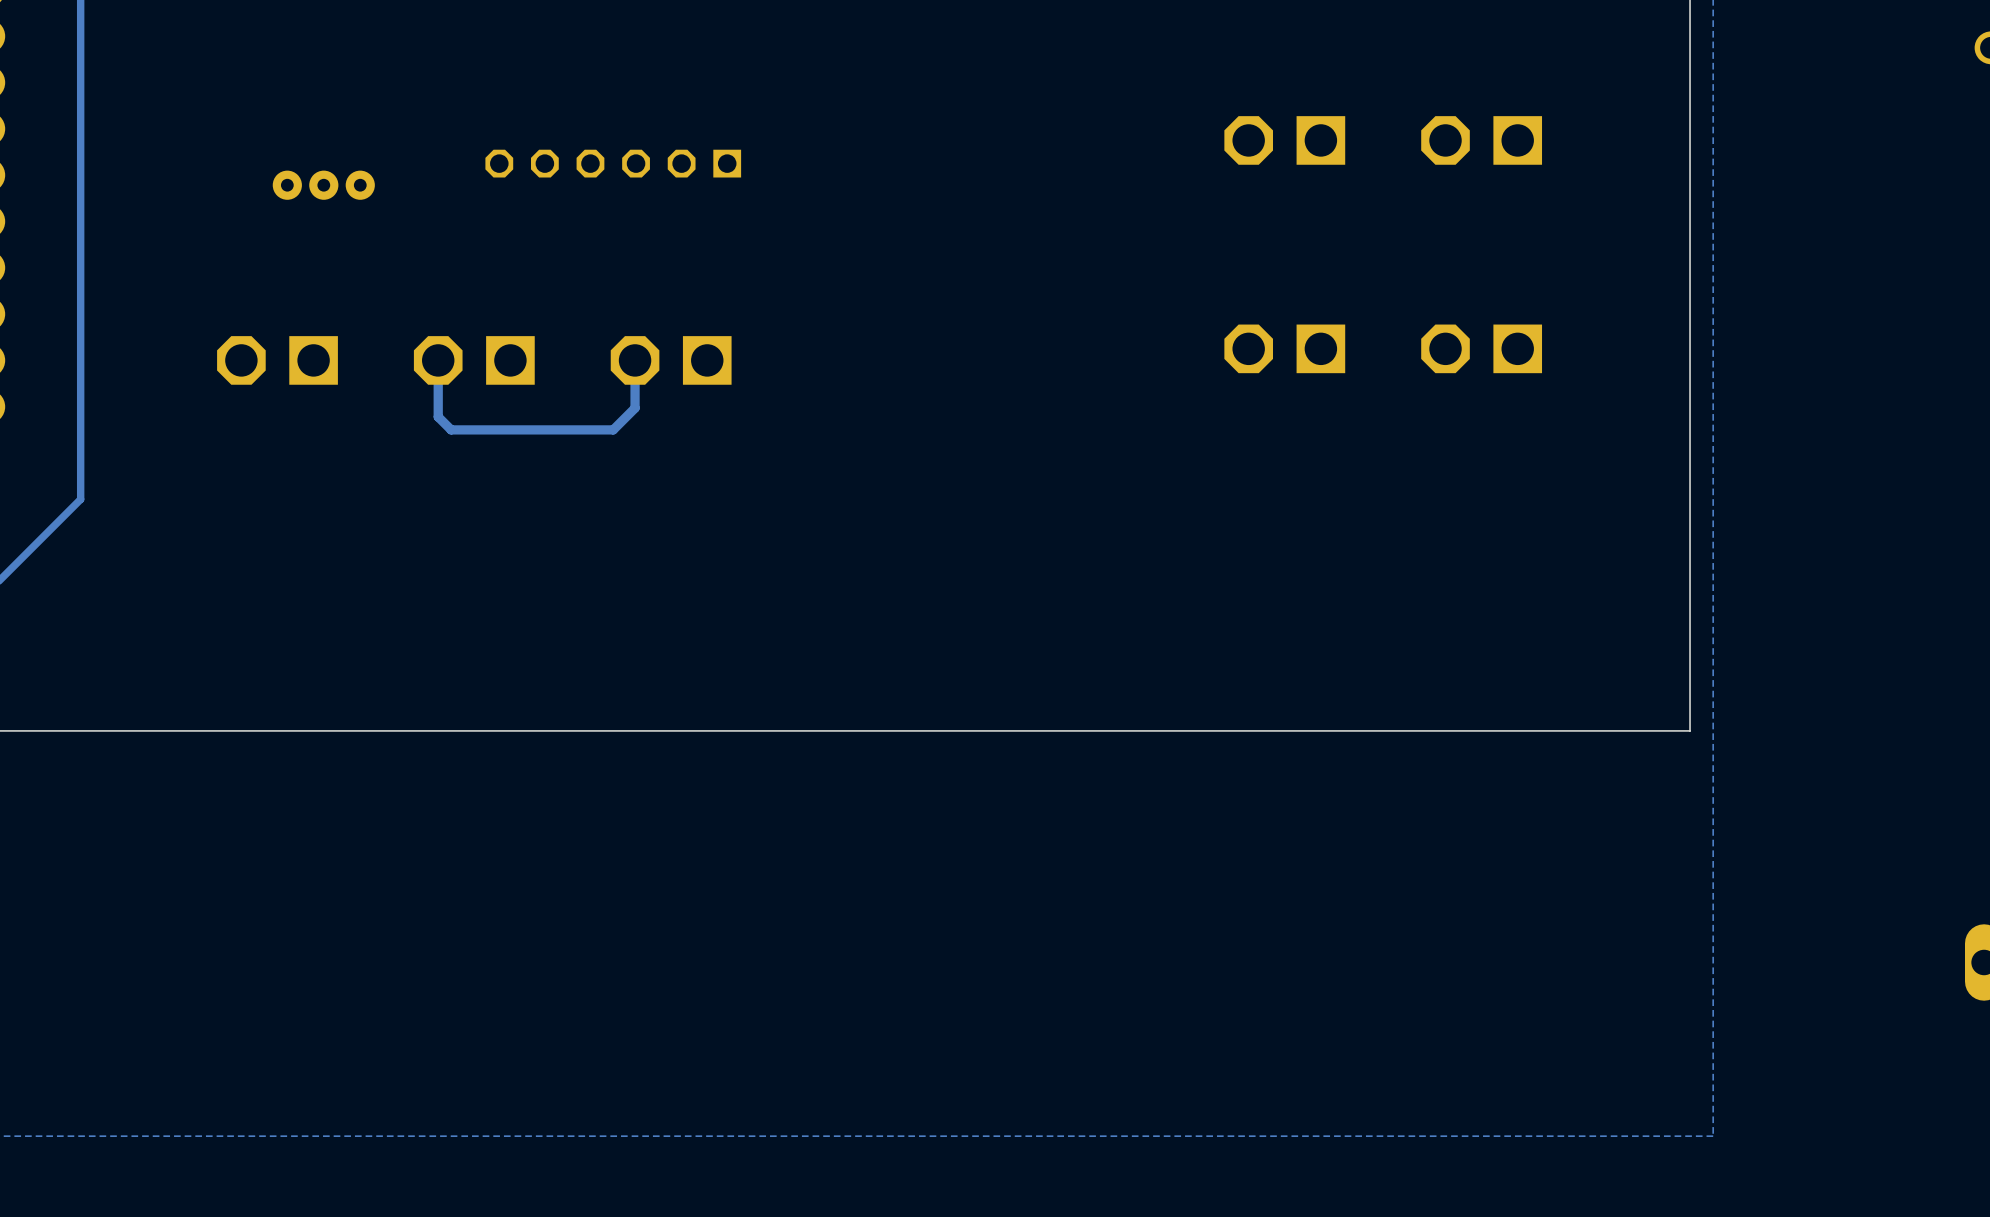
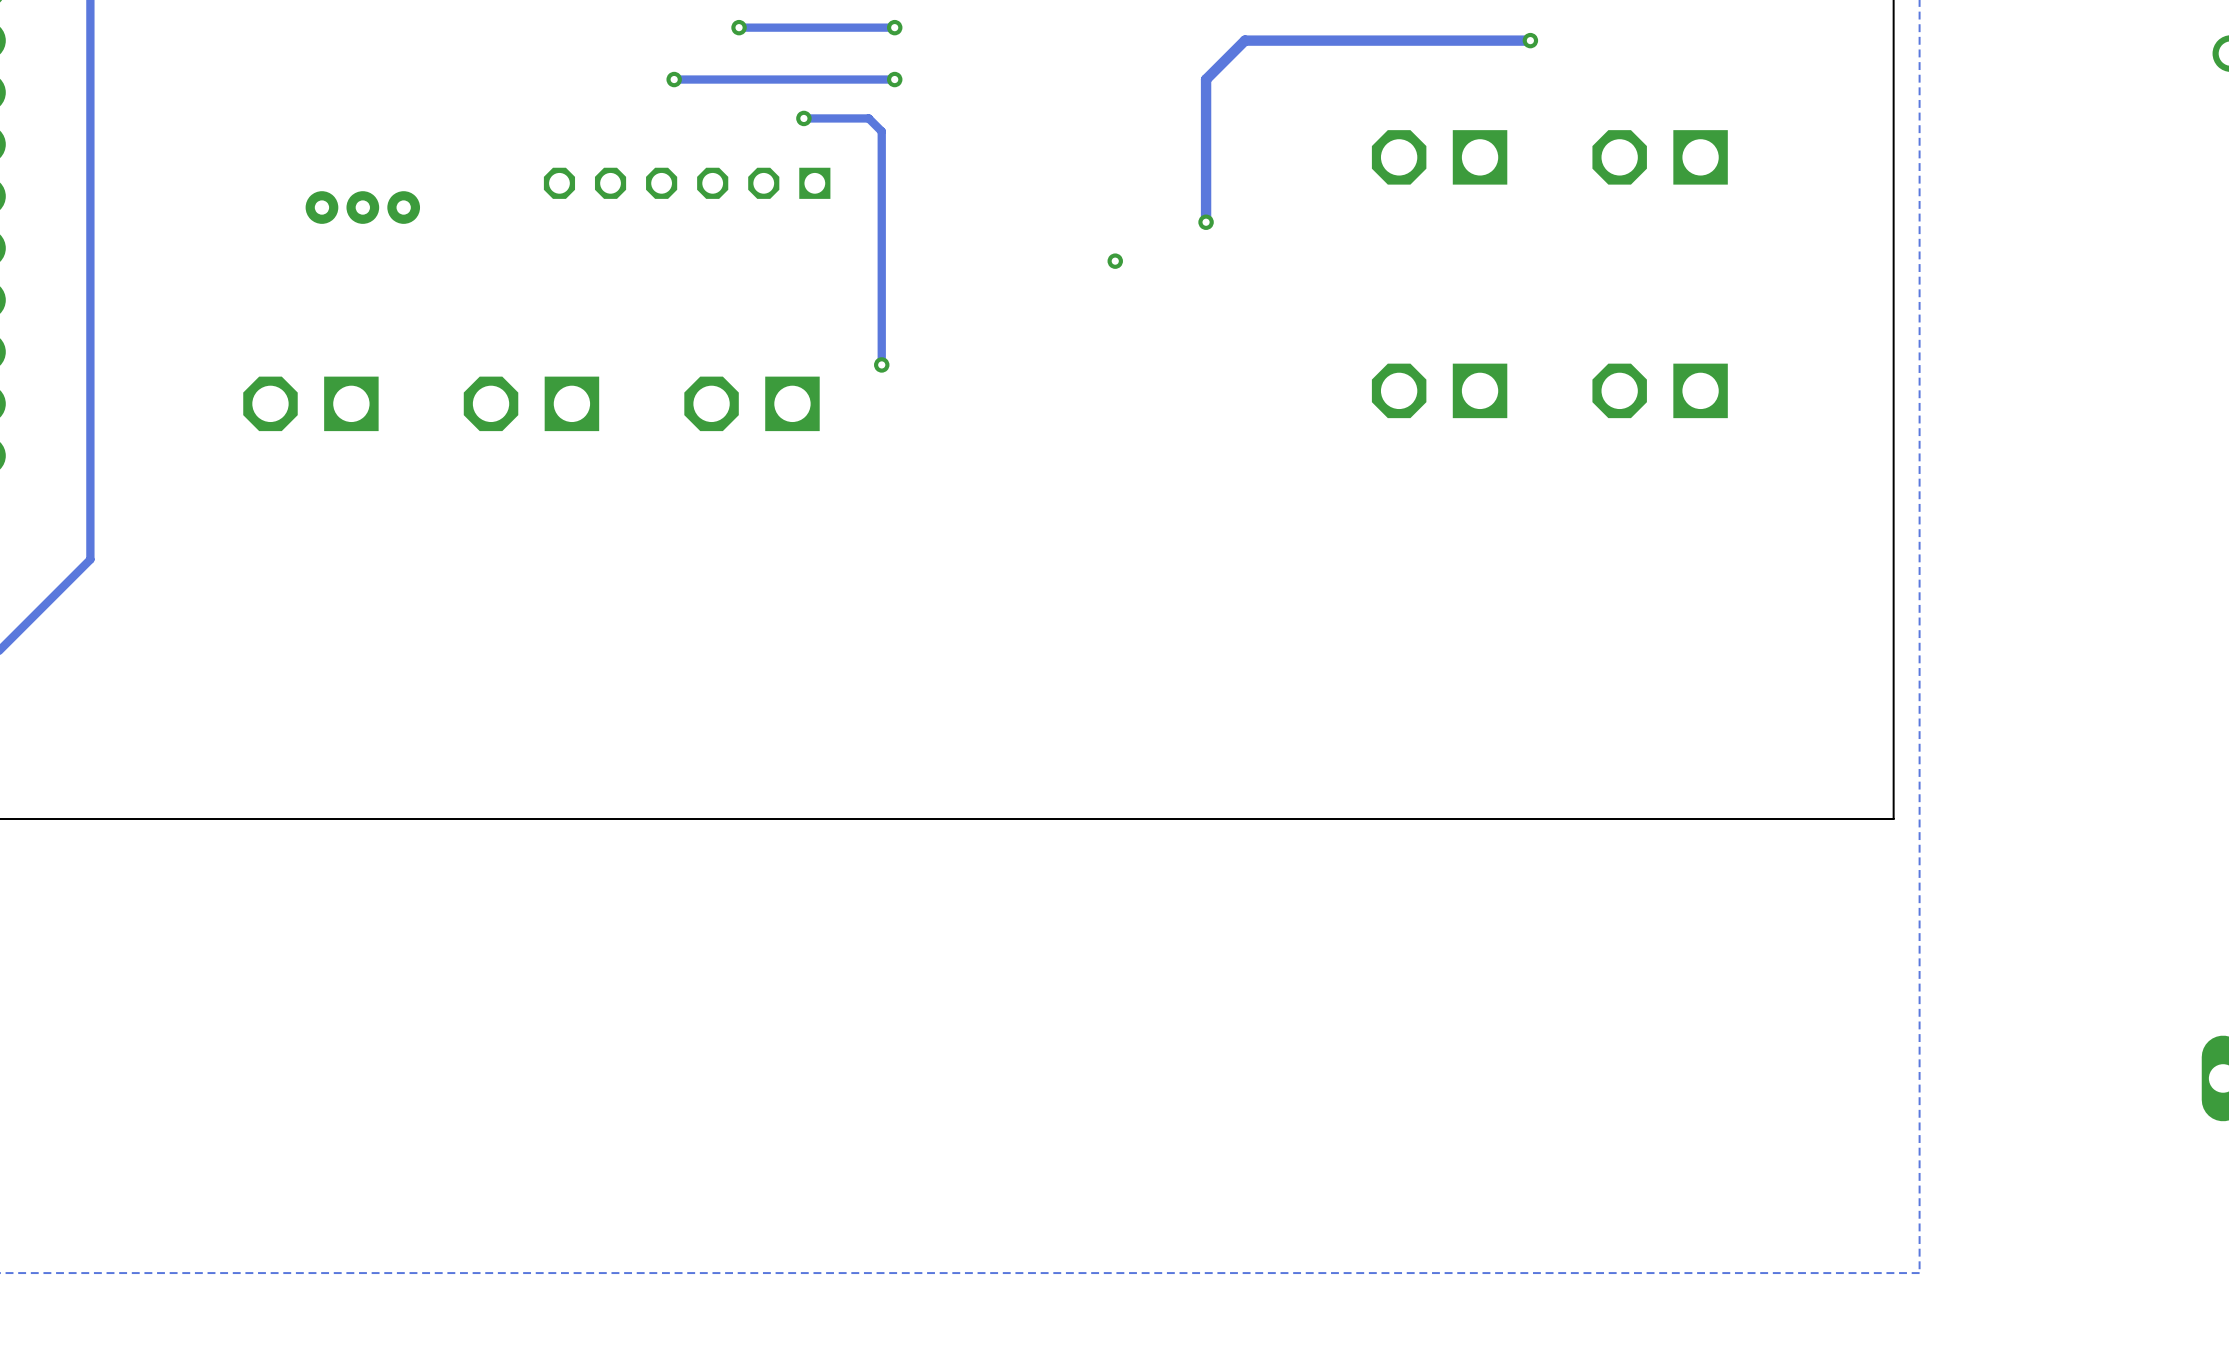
via: none -> (739, 27)
track: none -> (894, 27) (739, 27)
via: none -> (894, 27)
track: none -> (1530, 40) (1244, 40) (1206, 79) (1206, 222)
via: none -> (1530, 40)
via: none -> (674, 79)
track: none -> (894, 79) (674, 79)
via: none -> (894, 79)
track: none -> (803, 118) (868, 118) (881, 131) (881, 364)
via: none -> (803, 118)
via: none -> (1206, 222)
via: none -> (1115, 261)
via: none -> (881, 364)
track: (635, 360) (635, 408) (613, 429) (451, 429) (438, 416) (438, 360) -> none

